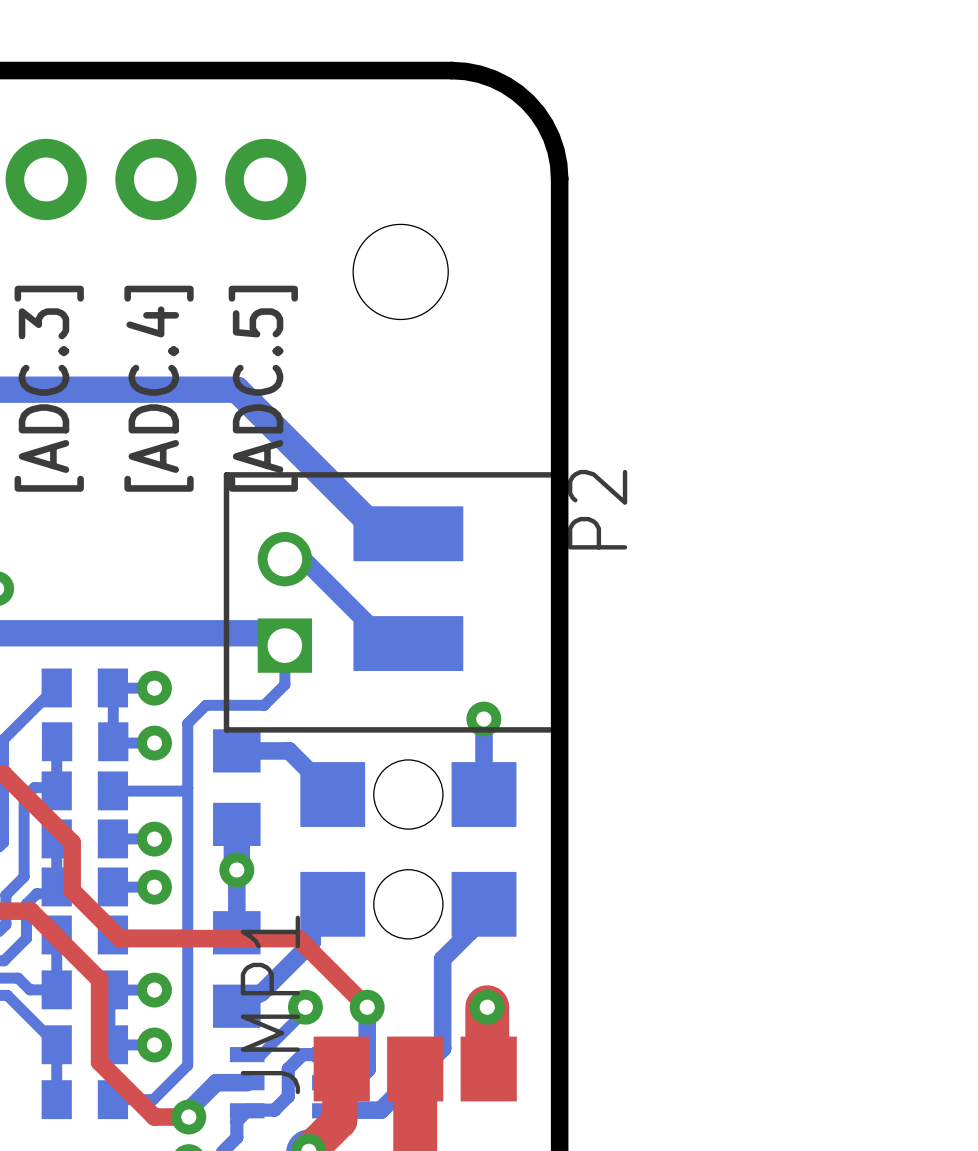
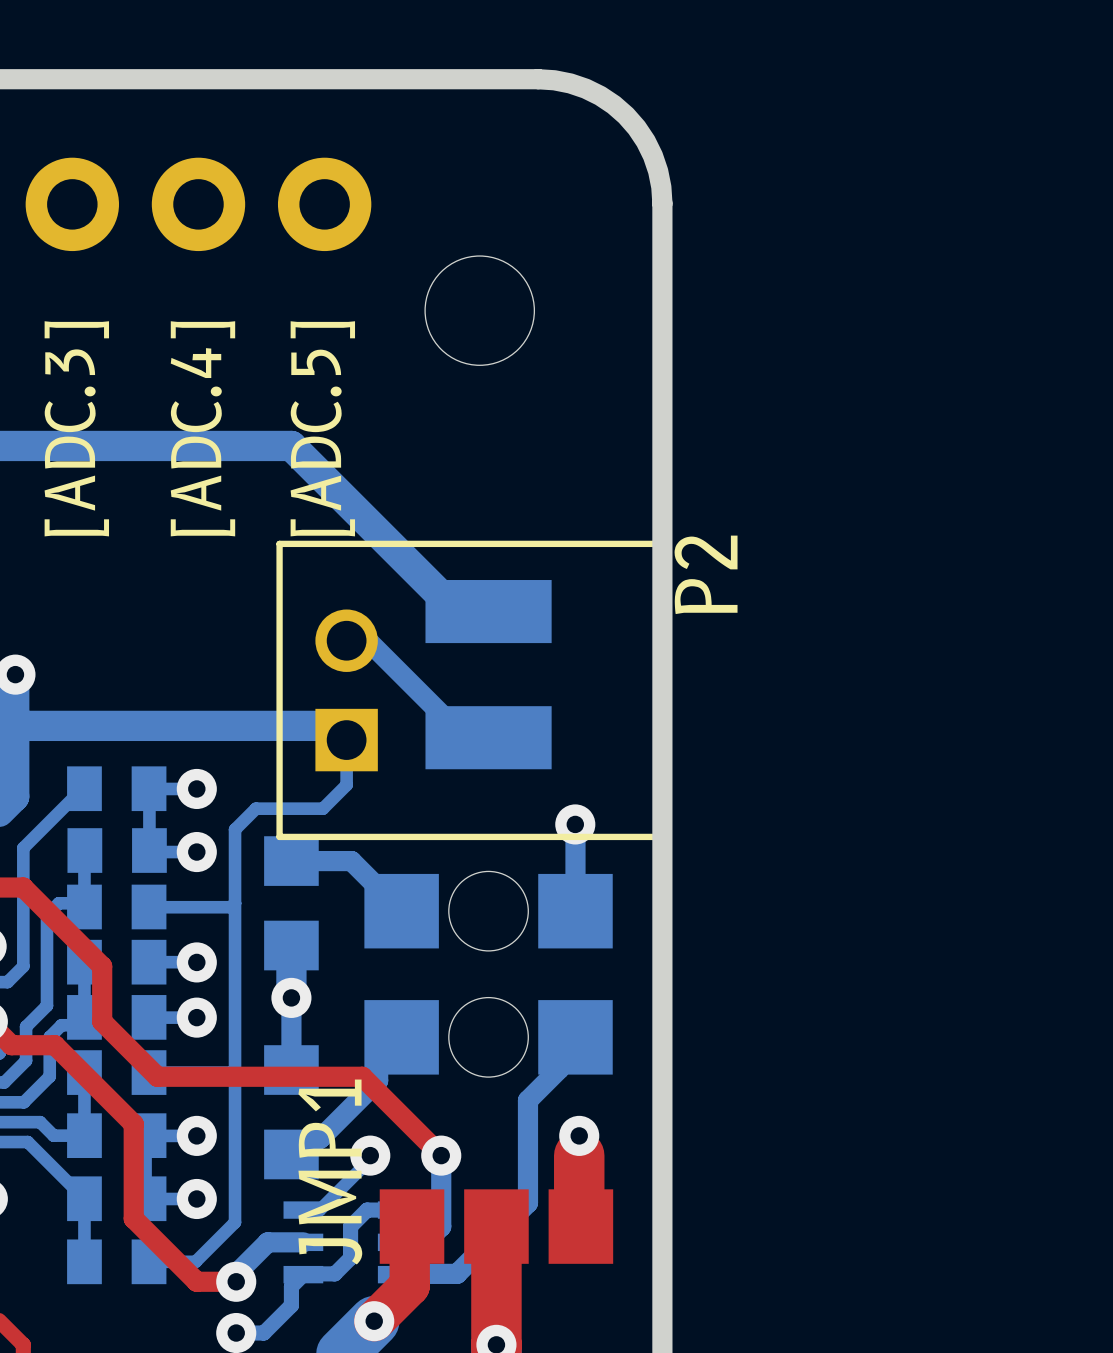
via position: (487, 1007) -> (579, 1135)

